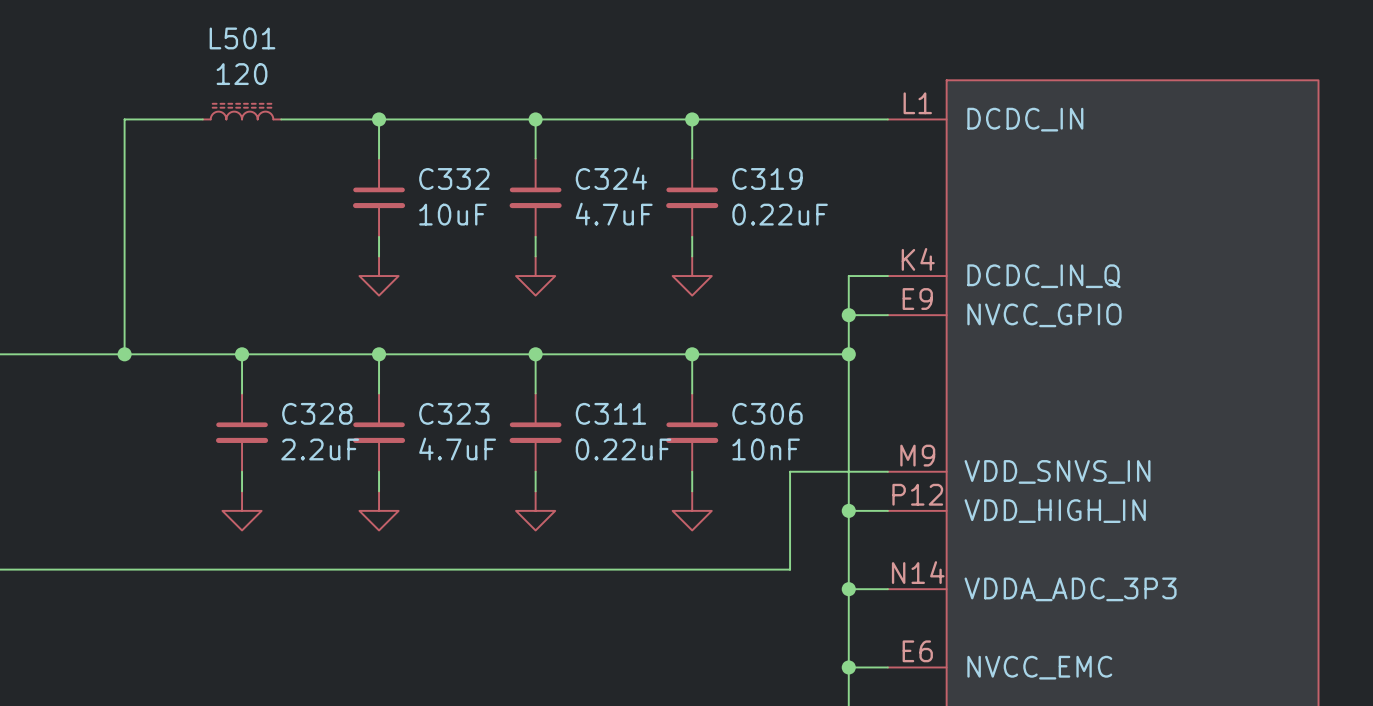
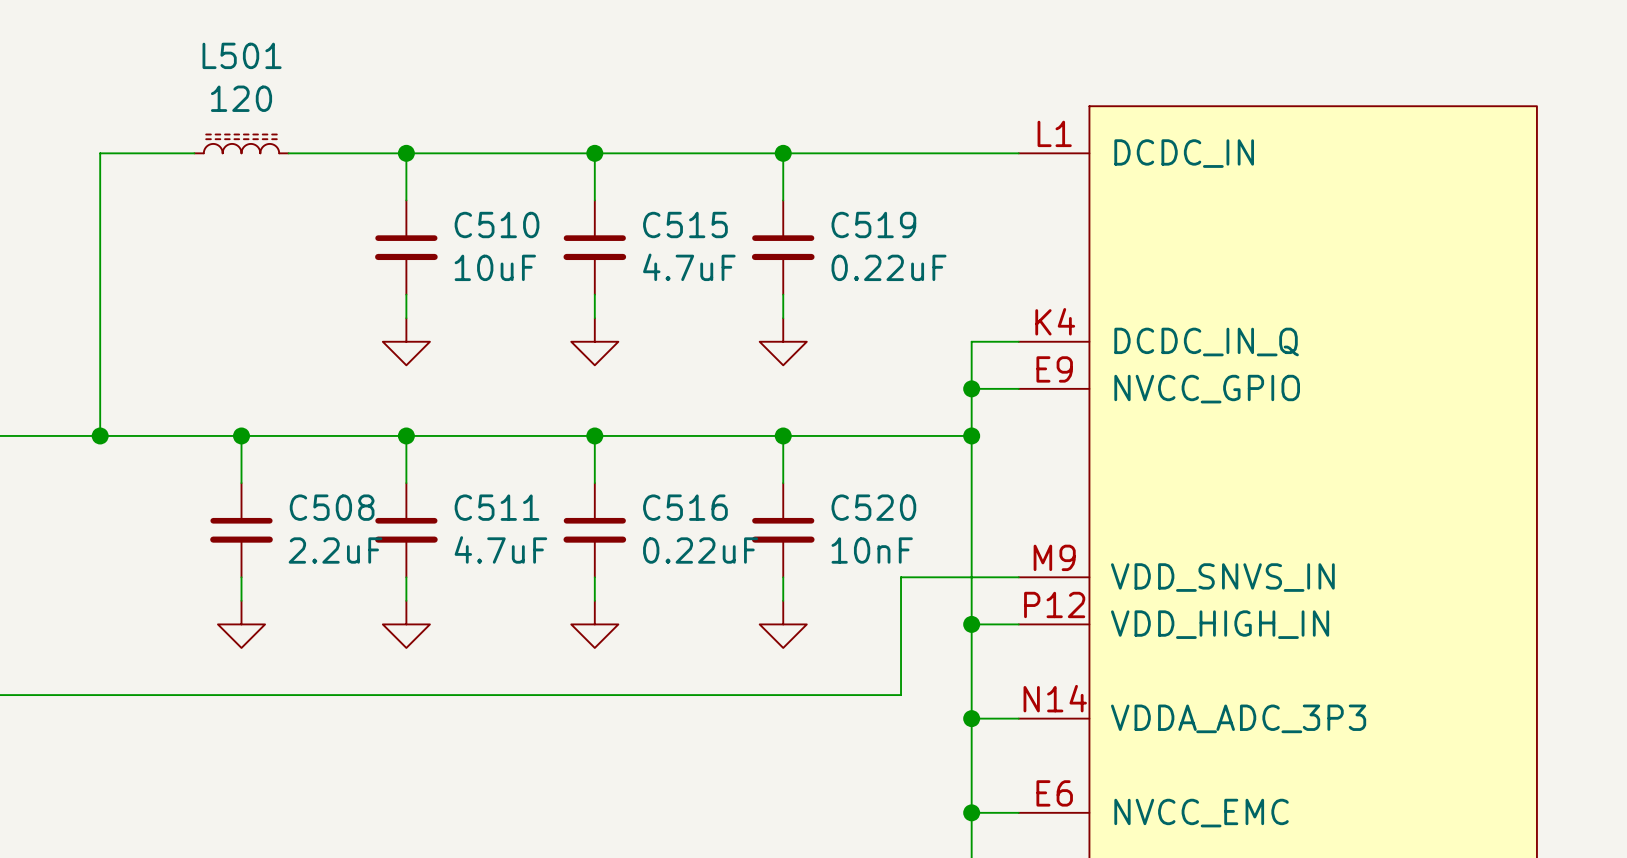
C332 name: C332 (454, 178) -> C510 (497, 225)
C324 name: C324 (611, 178) -> C515 (685, 225)
C319 name: C319 (767, 178) -> C519 (873, 225)
C328 name: C328 (317, 413) -> C508 (332, 507)
C323 name: C323 (454, 413) -> C511 (497, 507)
C311 name: C311 (610, 413) -> C516 (685, 507)
C306 name: C306 (767, 413) -> C520 (873, 507)

